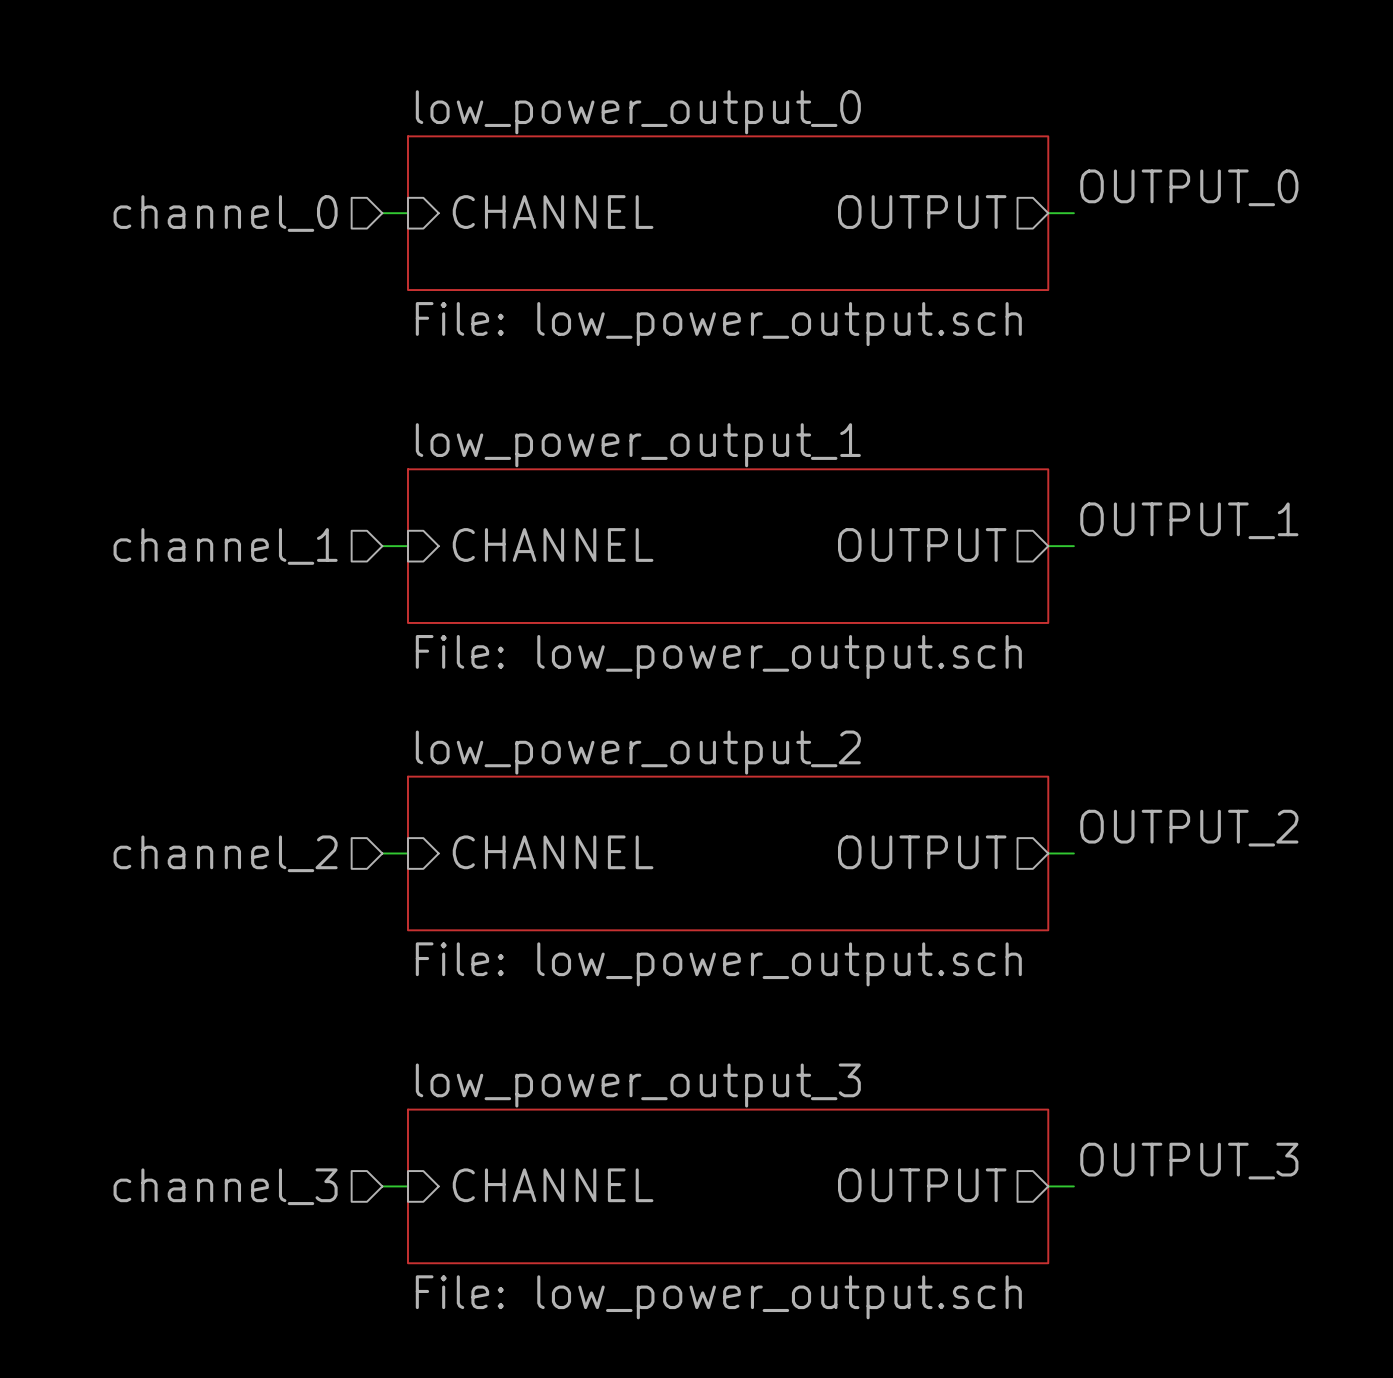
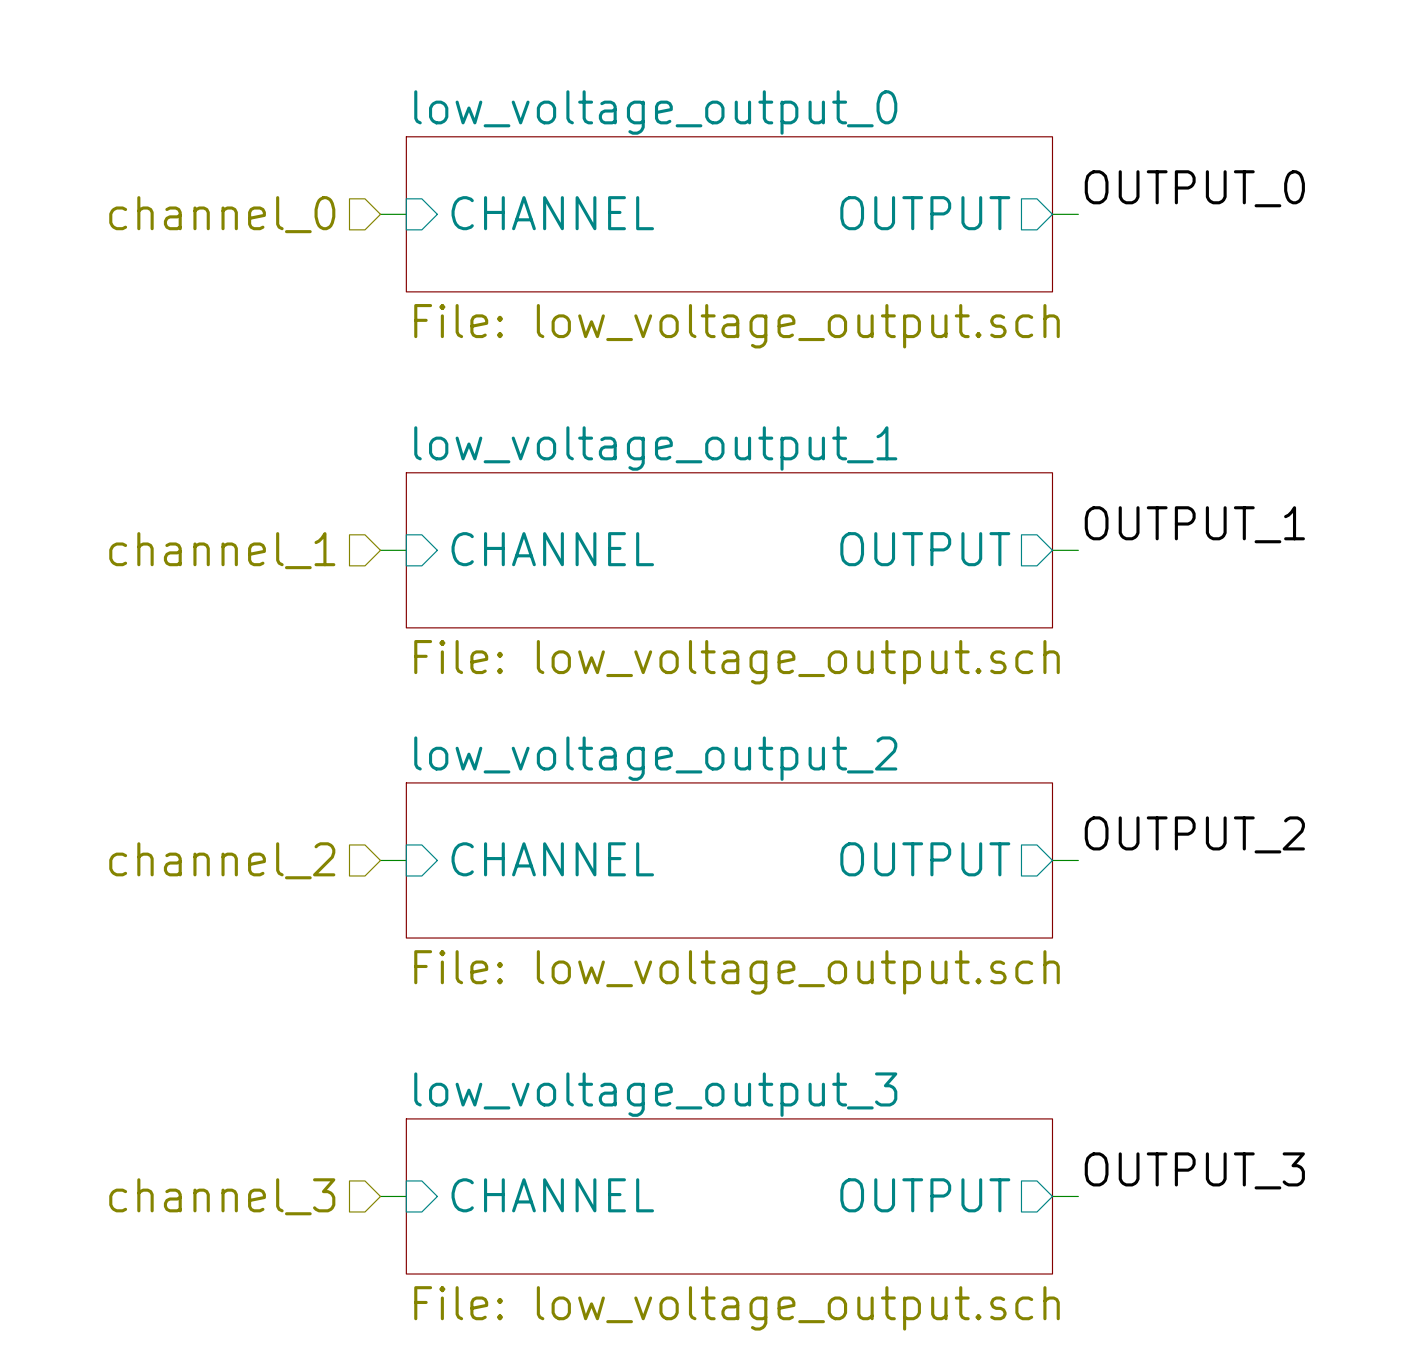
sheet low_power_output_0 name: low_power_output_0 (638, 112) -> low_voltage_output_0 (655, 112)
sheet low_power_output_0 value: File: low_power_output.sch (718, 324) -> File: low_voltage_output.sch (737, 326)
sheet low_power_output_1 name: low_power_output_1 (638, 445) -> low_voltage_output_1 (655, 448)
sheet low_power_output_1 value: File: low_power_output.sch (718, 657) -> File: low_voltage_output.sch (737, 662)
sheet low_power_output_2 name: low_power_output_2 (638, 752) -> low_voltage_output_2 (655, 758)
sheet low_power_output_2 value: File: low_power_output.sch (718, 964) -> File: low_voltage_output.sch (737, 972)
sheet low_power_output_3 name: low_power_output_3 (638, 1085) -> low_voltage_output_3 (655, 1094)
sheet low_power_output_3 value: File: low_power_output.sch (718, 1297) -> File: low_voltage_output.sch (737, 1308)

